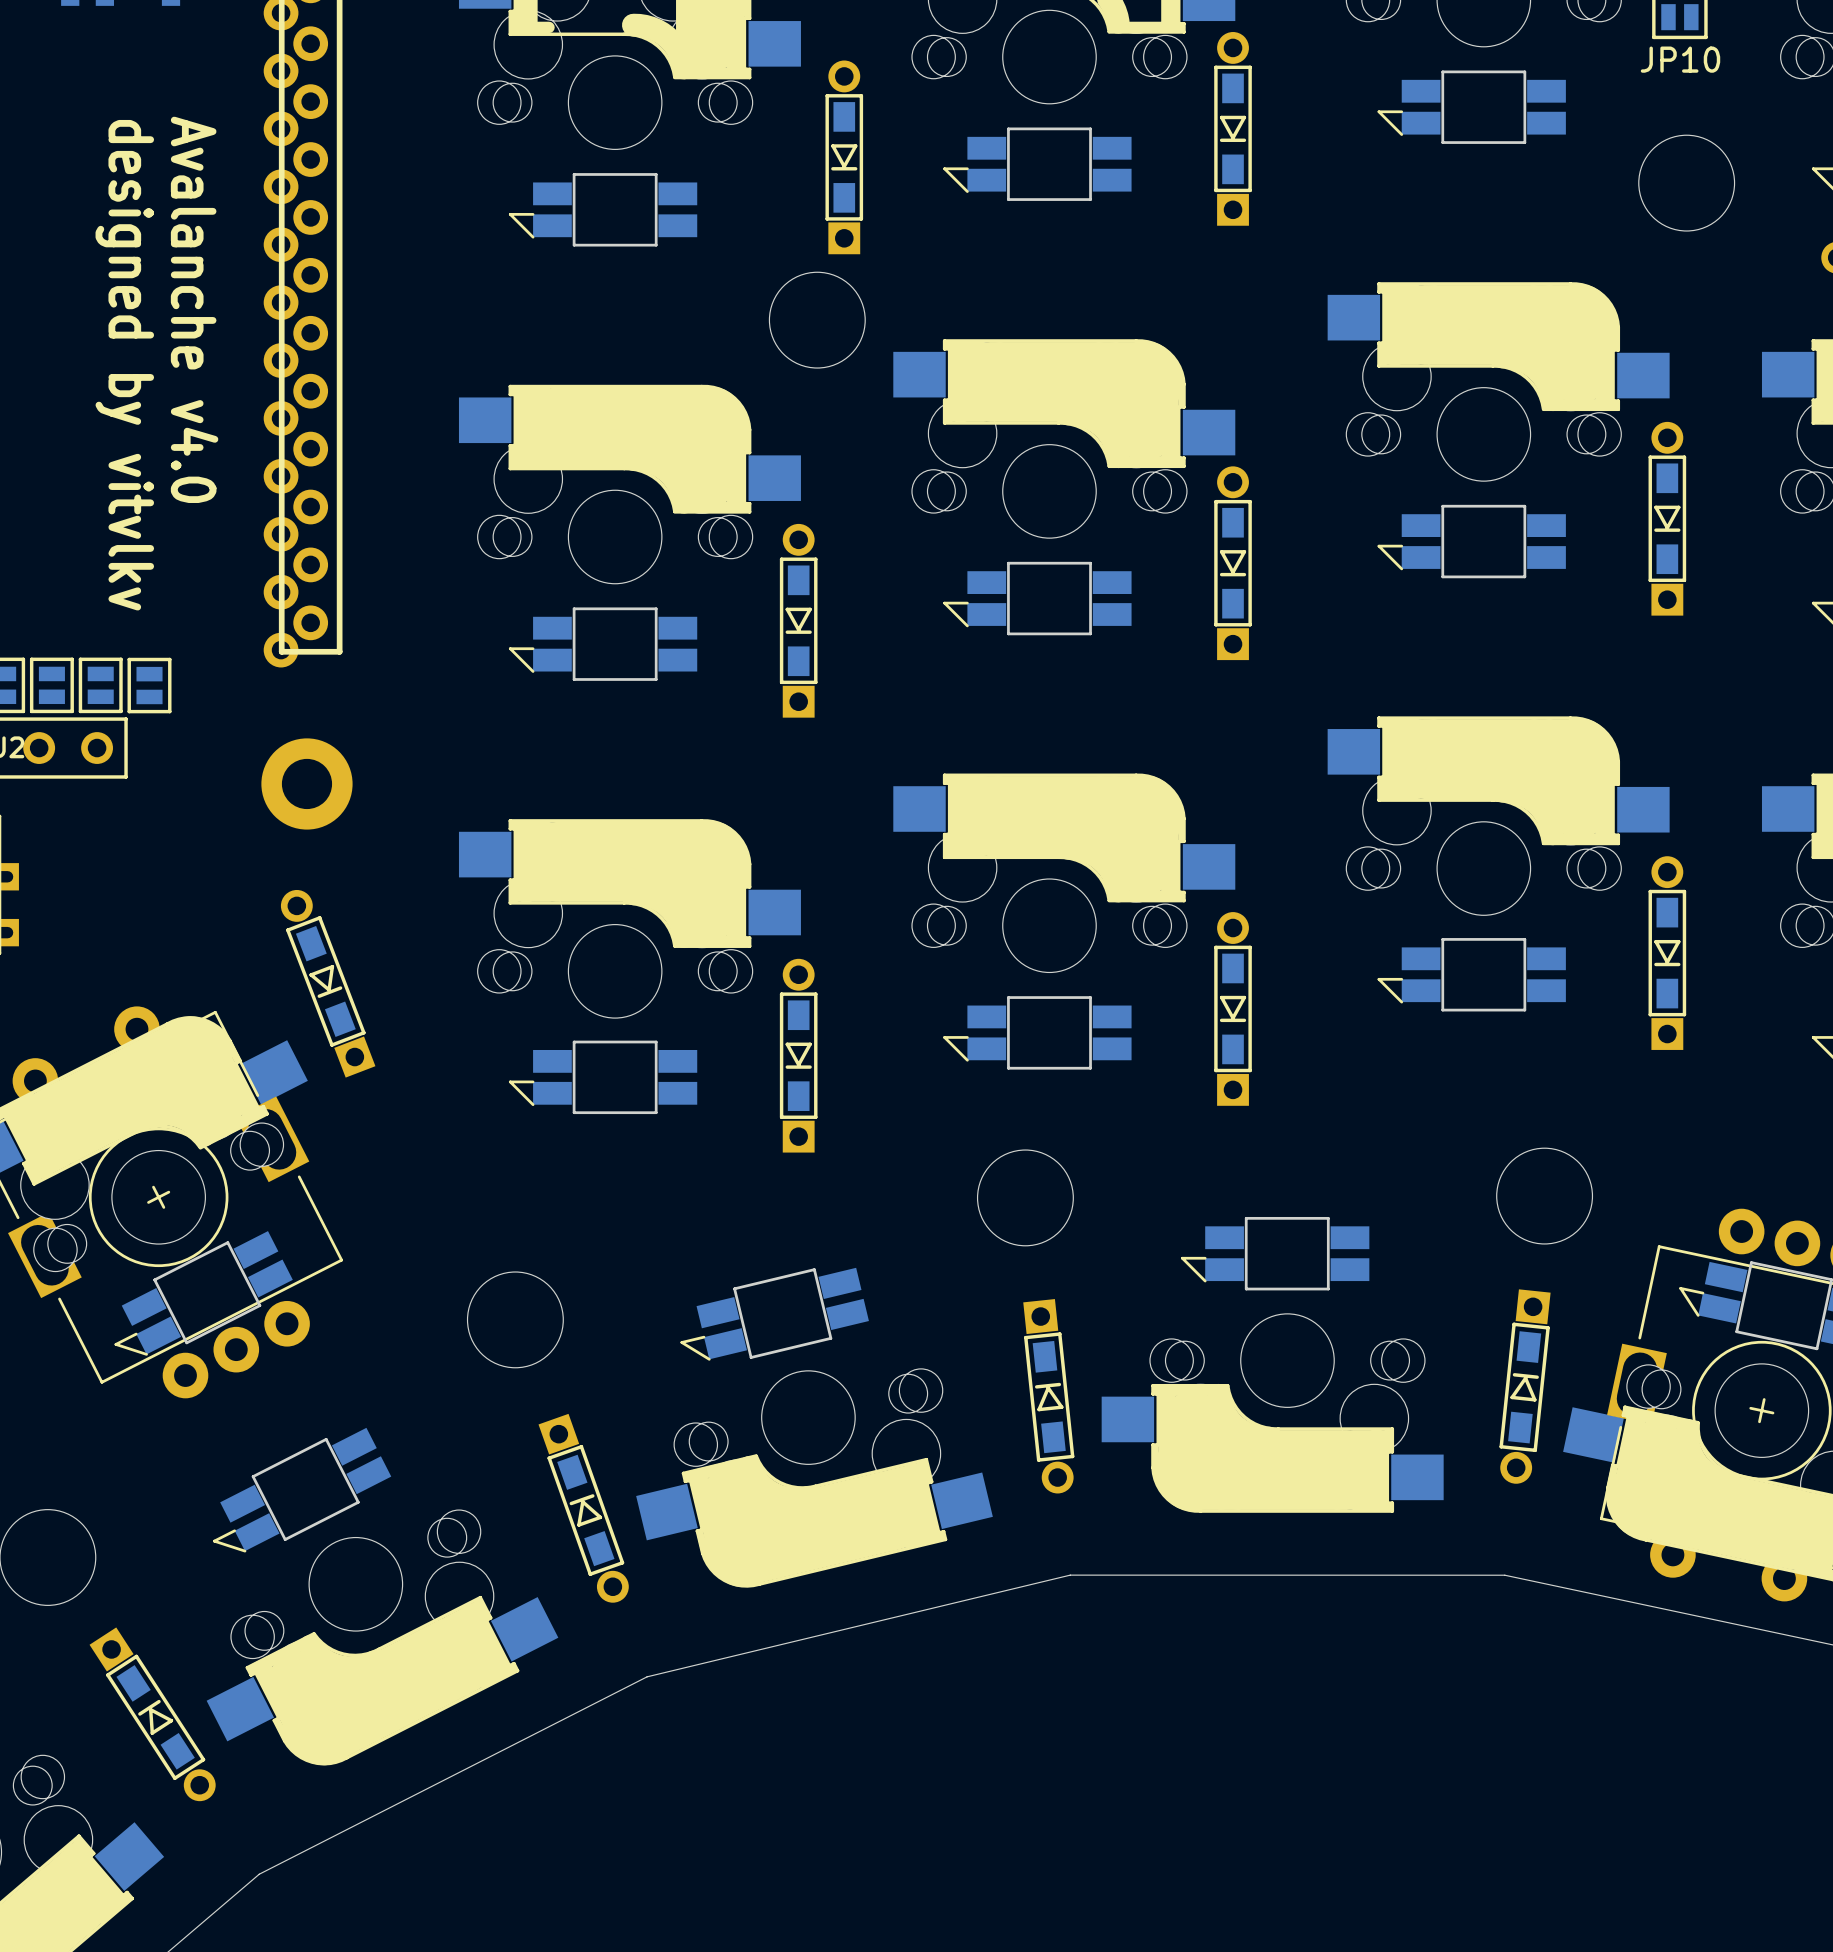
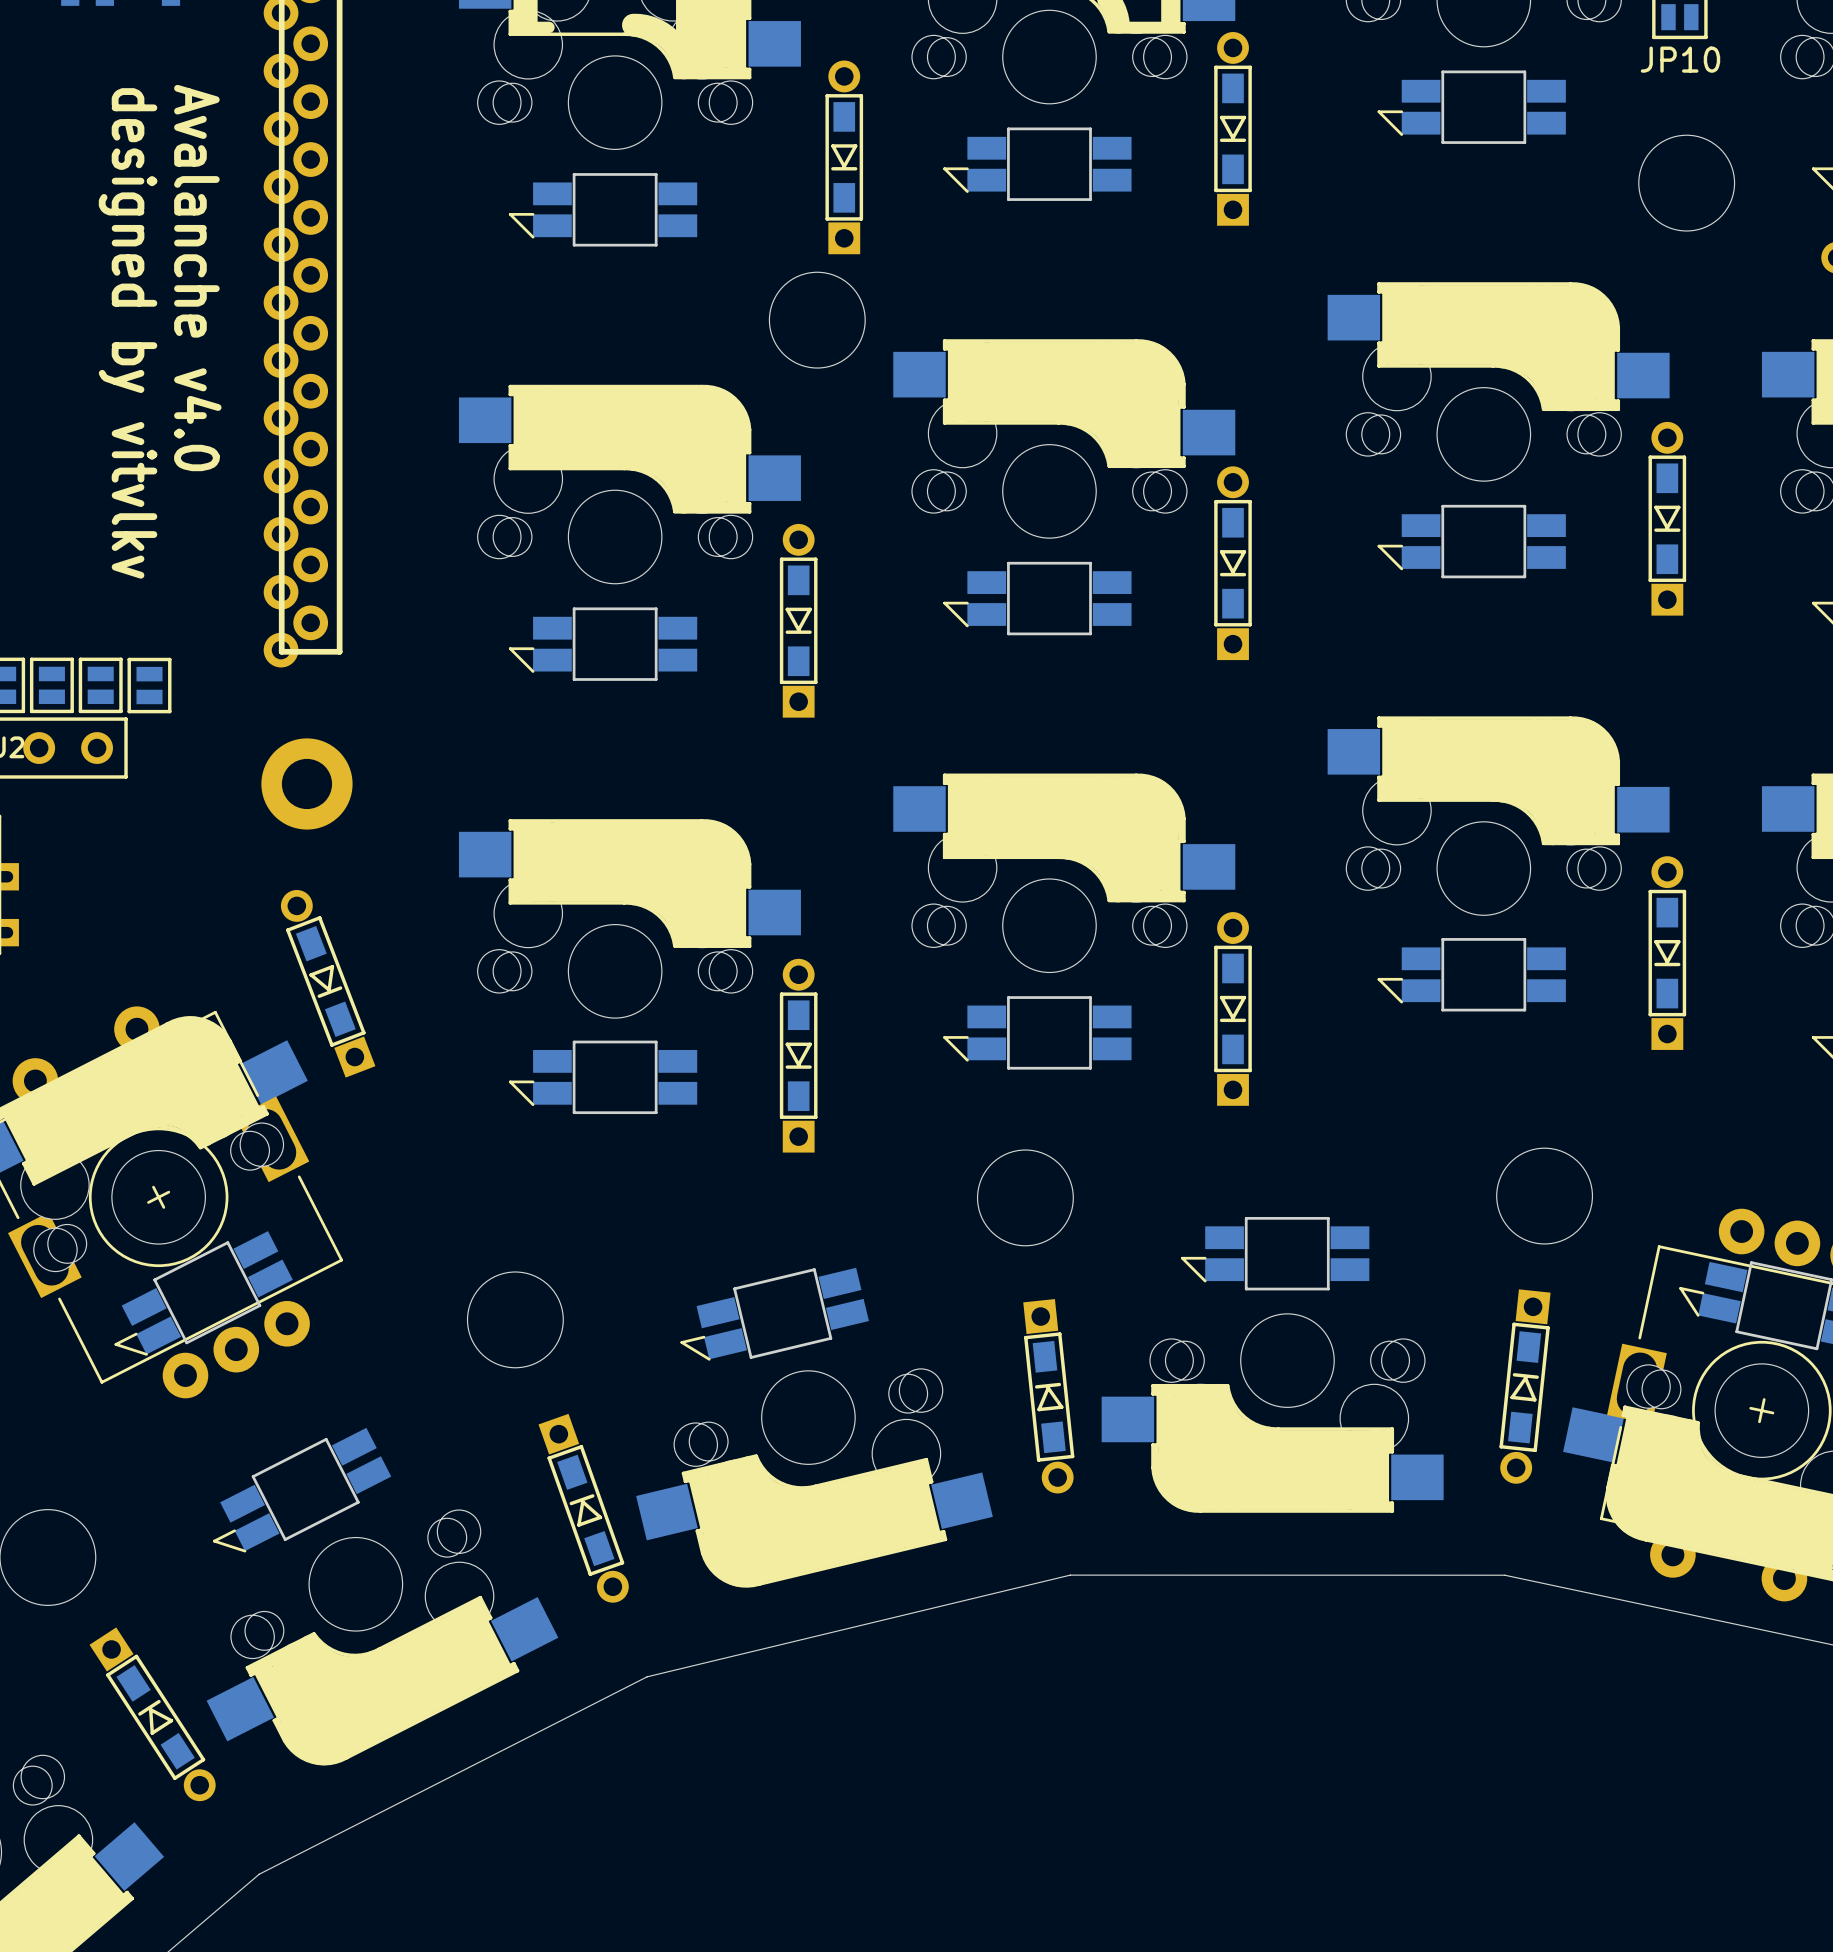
text position: Avalanche v4.0 (194, 309) -> Avalanche v4.0 (197, 278)
text position: designed by vitvlkv (124, 365) -> designed by vitvlkv (128, 333)

